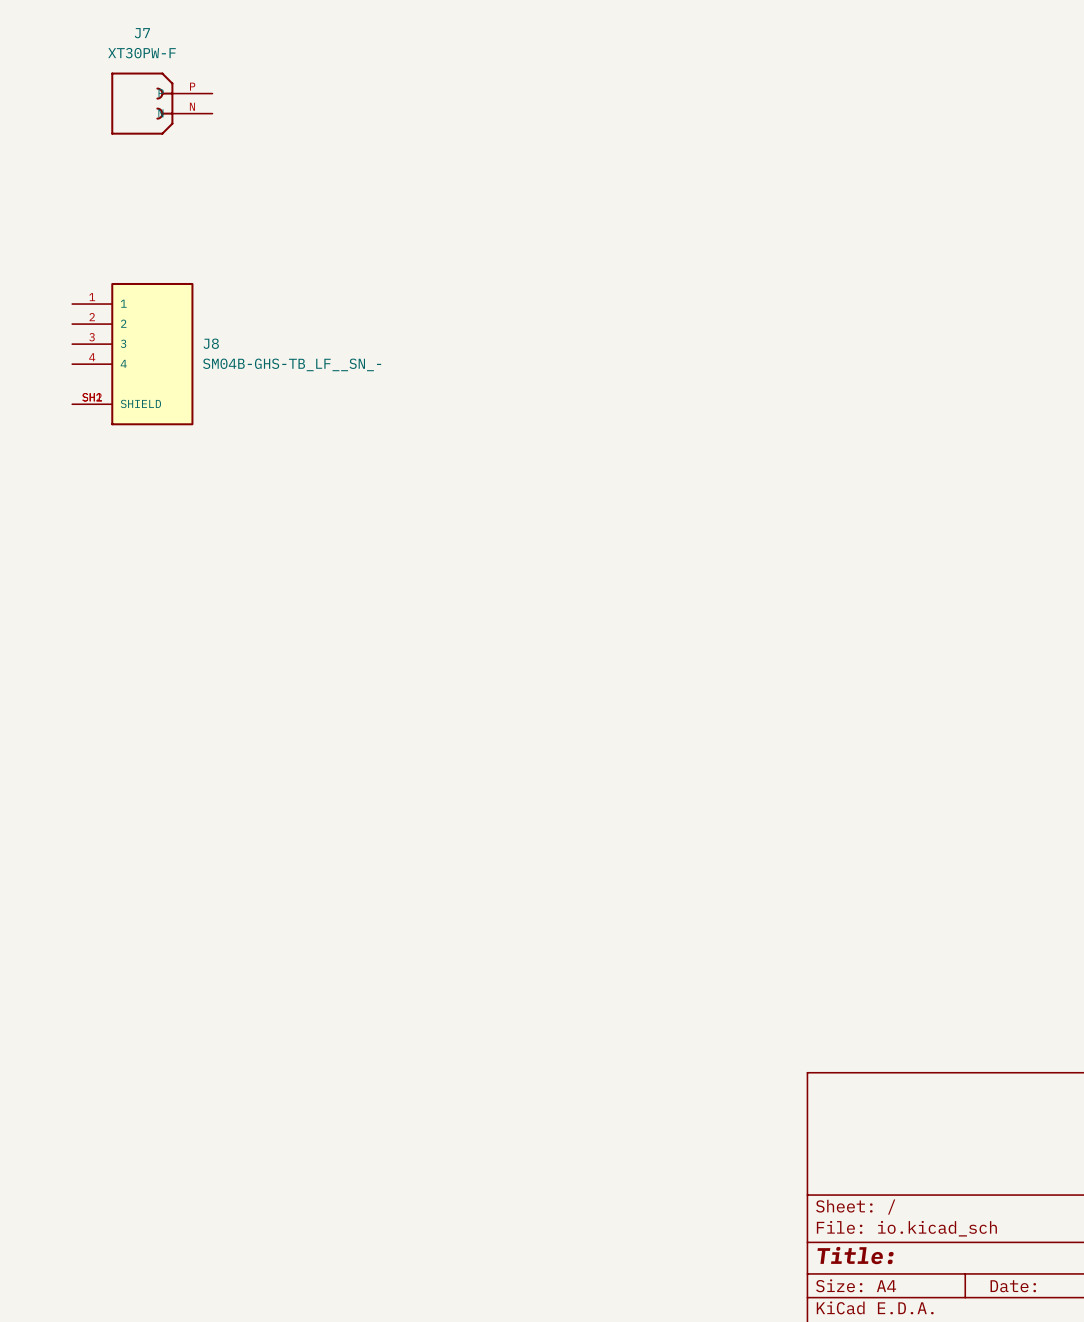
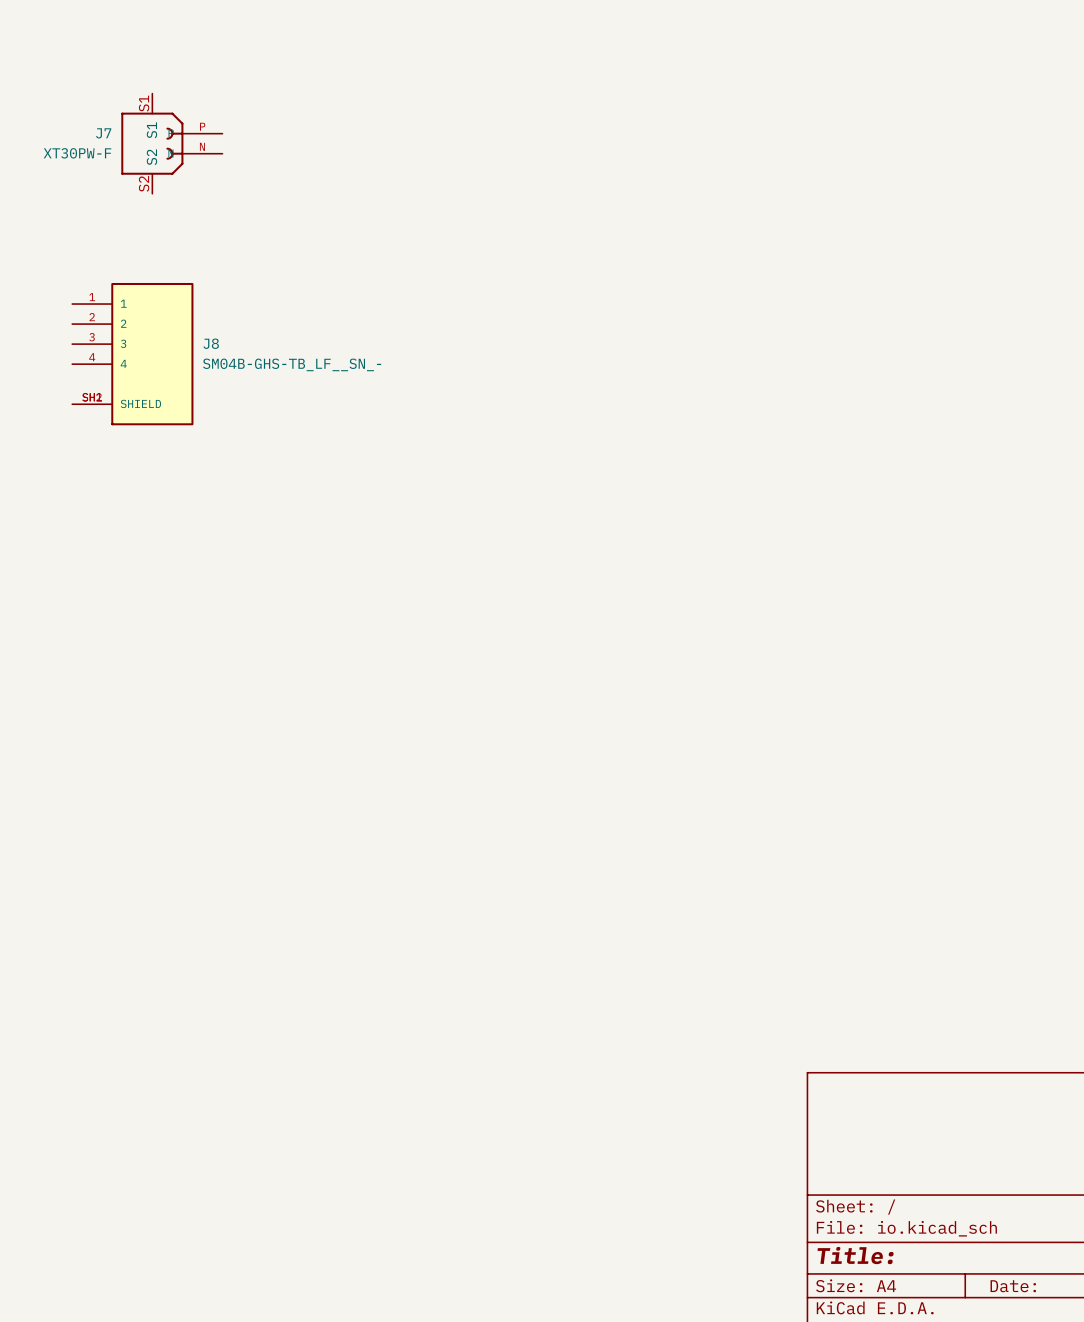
J7 name position: J7 (142, 33) -> J7 (103, 133)
J7 value position: XT30PW-F (142, 53) -> XT30PW-F (77, 153)
J7 symbol: [111, 72, 213, 135] -> [121, 93, 223, 194]

